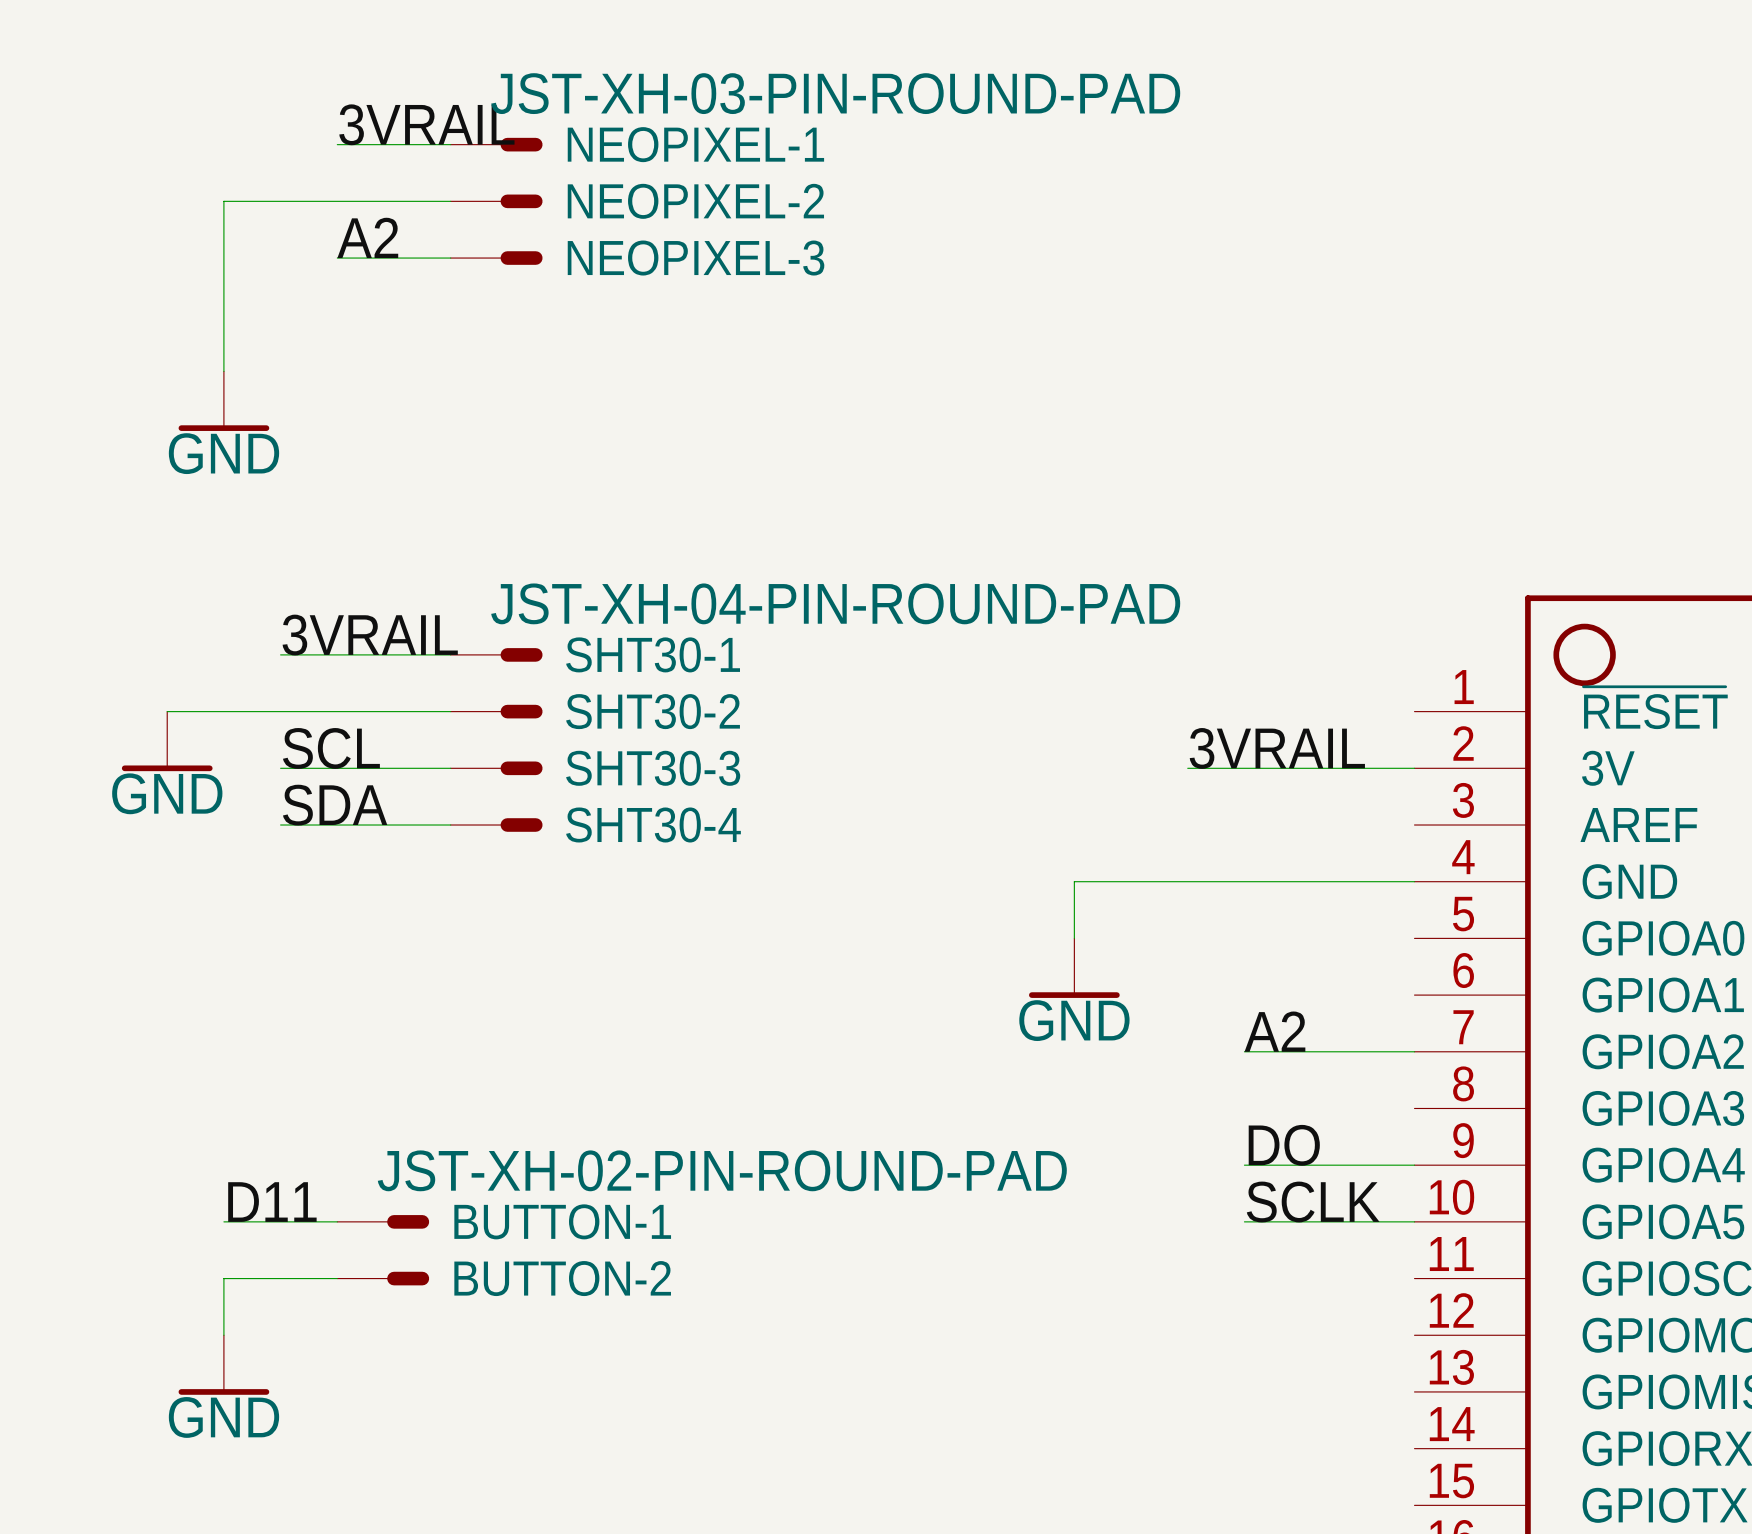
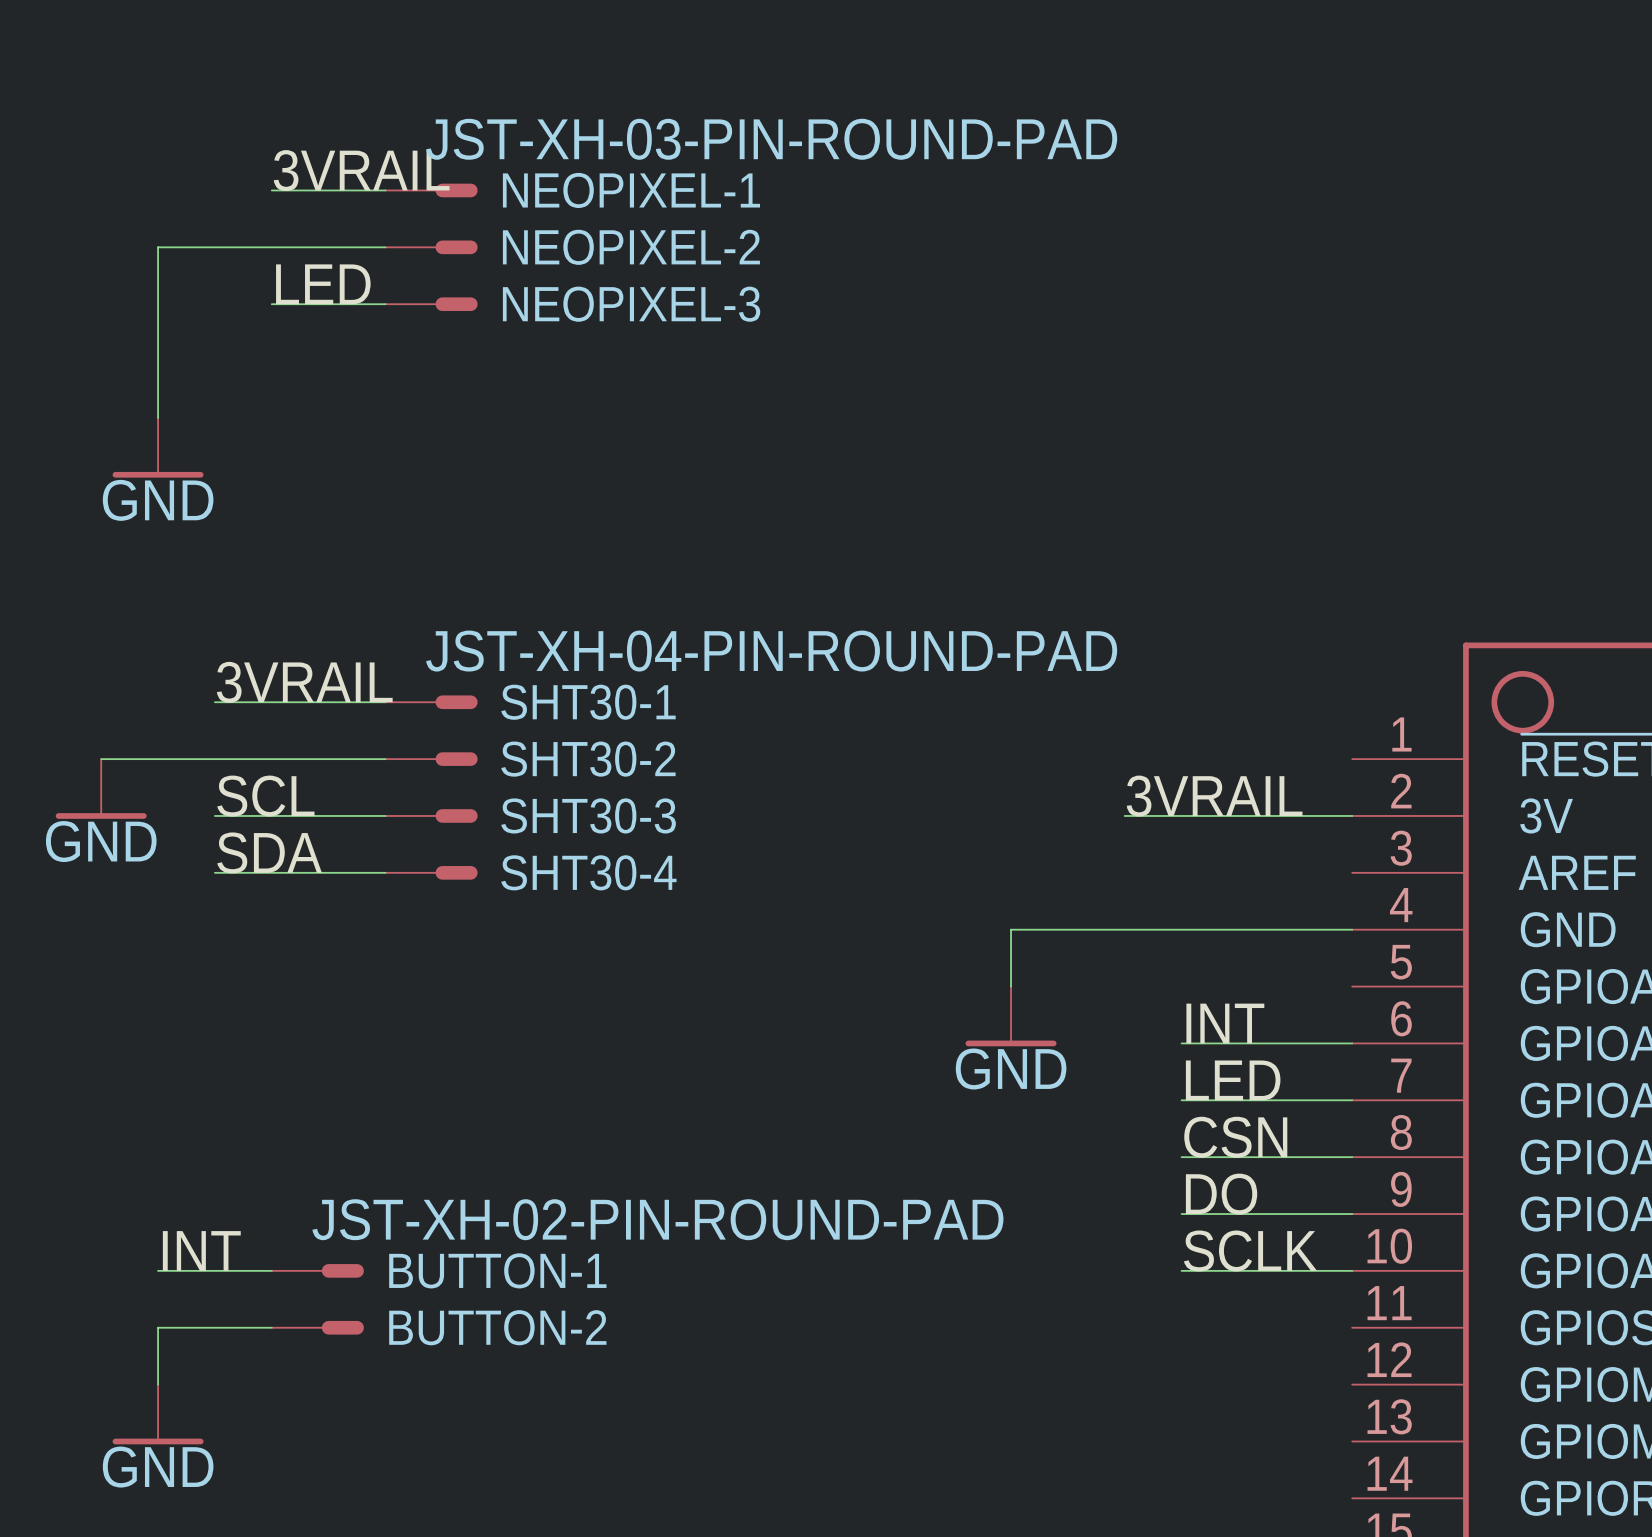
label: A2 (367, 237) -> LED (323, 284)
label: none -> INT (1225, 1023)
wire: none -> (1181, 1043) (1352, 1043)
label: A2 (1274, 1031) -> LED (1233, 1080)
label: none -> CSN (1235, 1137)
wire: none -> (1181, 1157) (1352, 1157)
label: D11 (272, 1202) -> INT (201, 1250)

